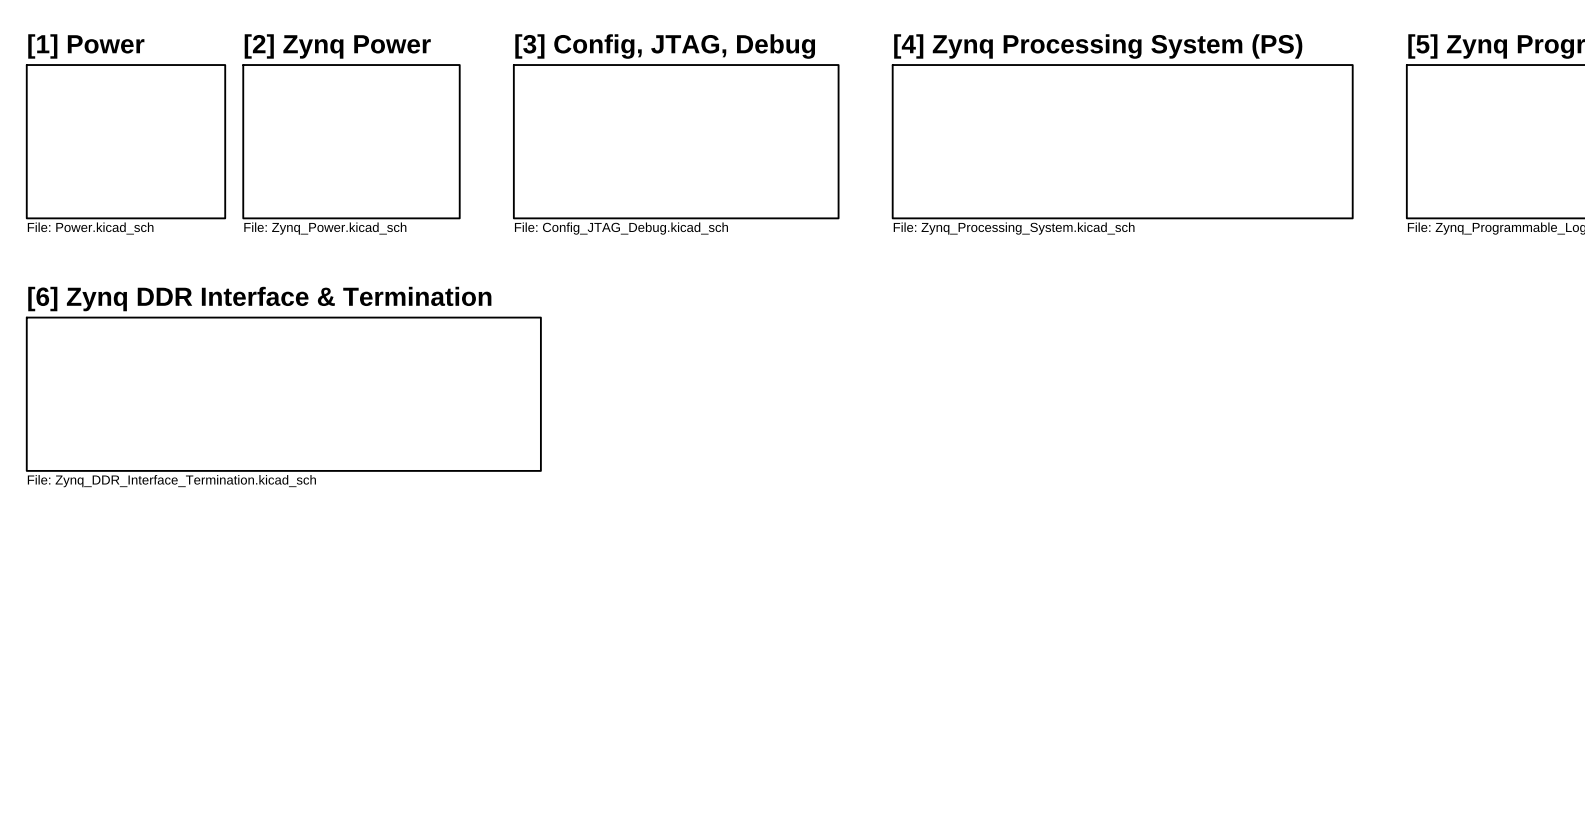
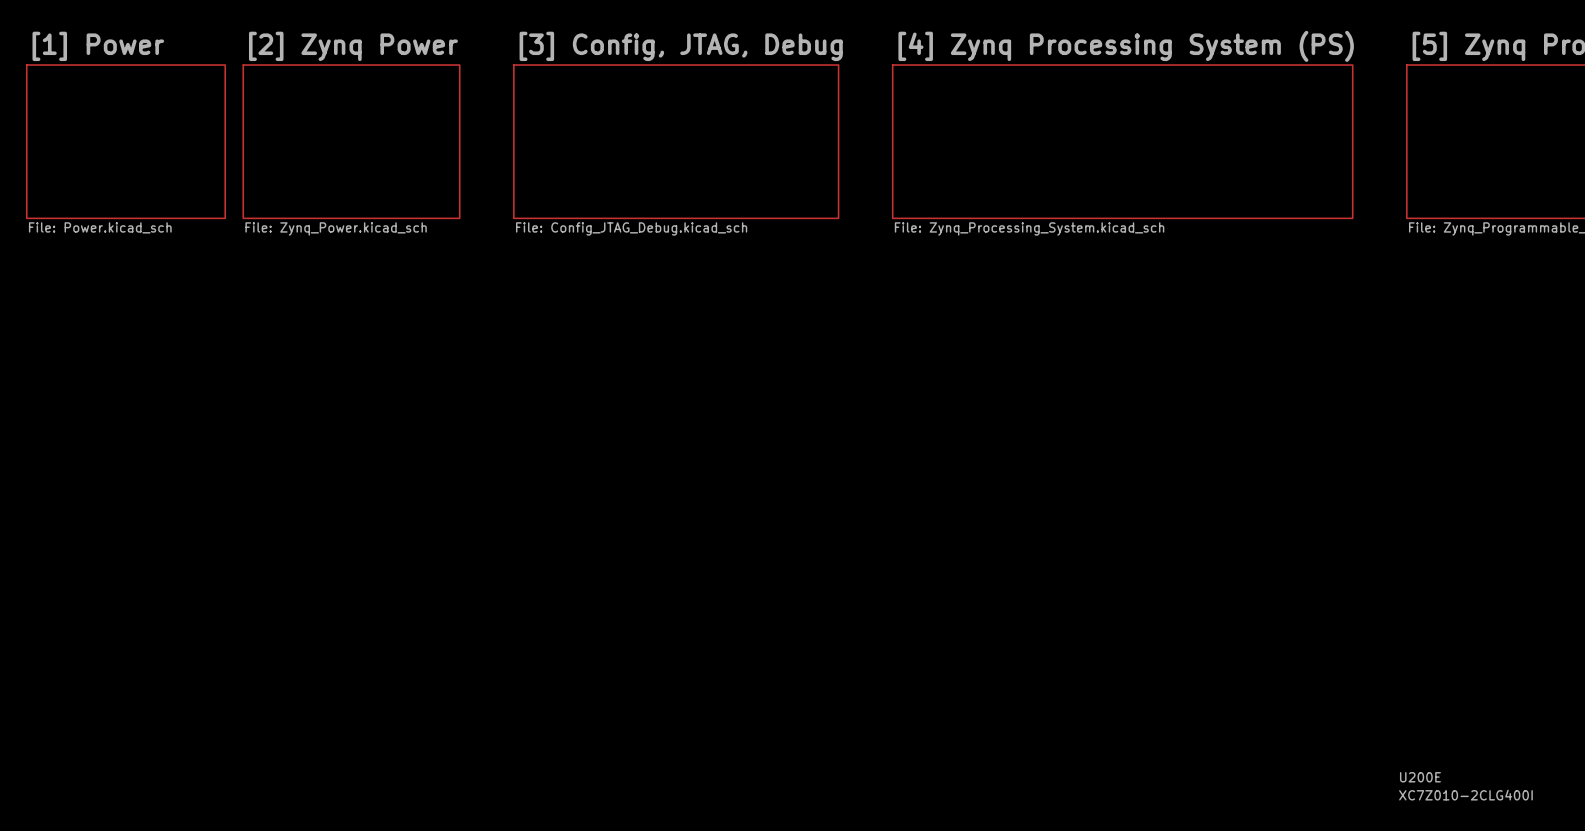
sheet [6] Zynq DDR Interface & Termination: File: Zynq_DDR_Interface_Termination.kicad_sch (283, 394) -> none
U200E: none -> XC7Z010-2CLG400I (1465, 786)

